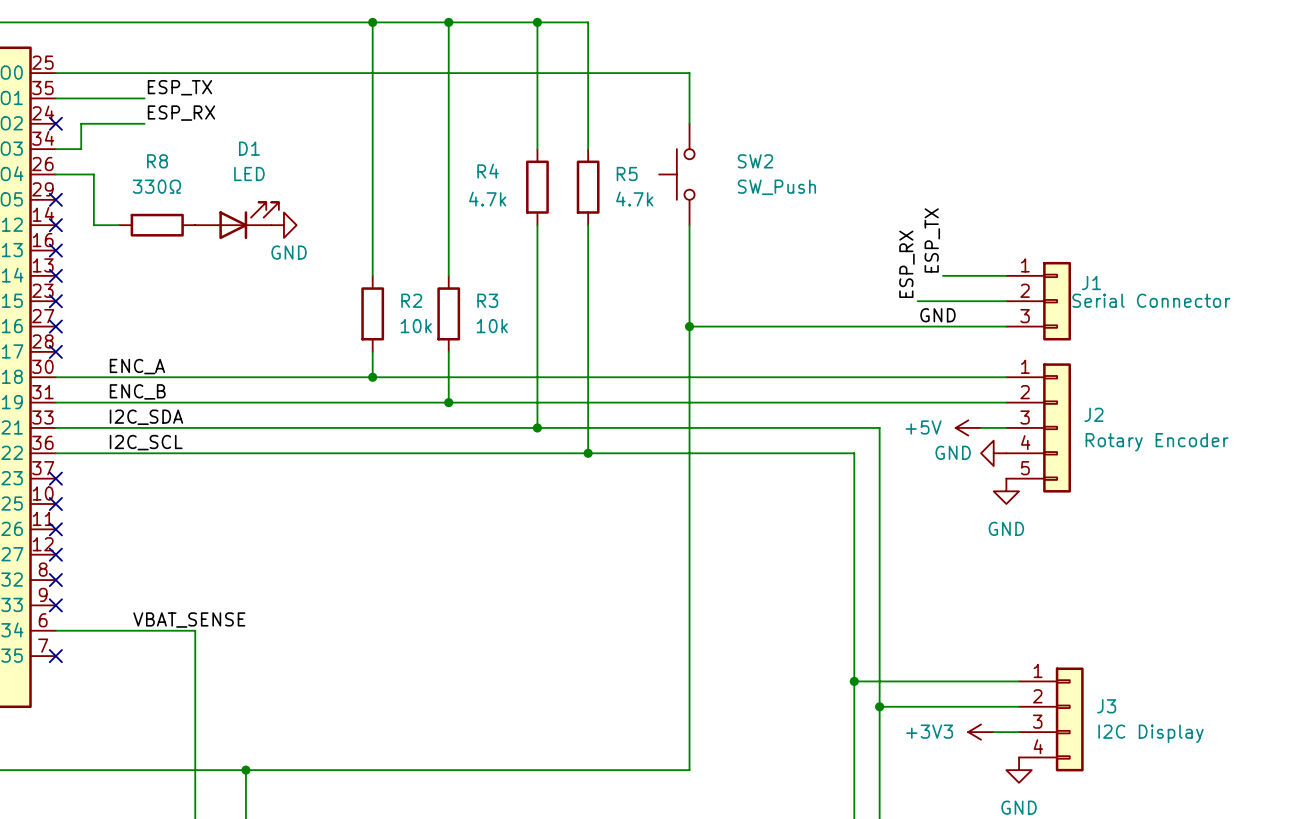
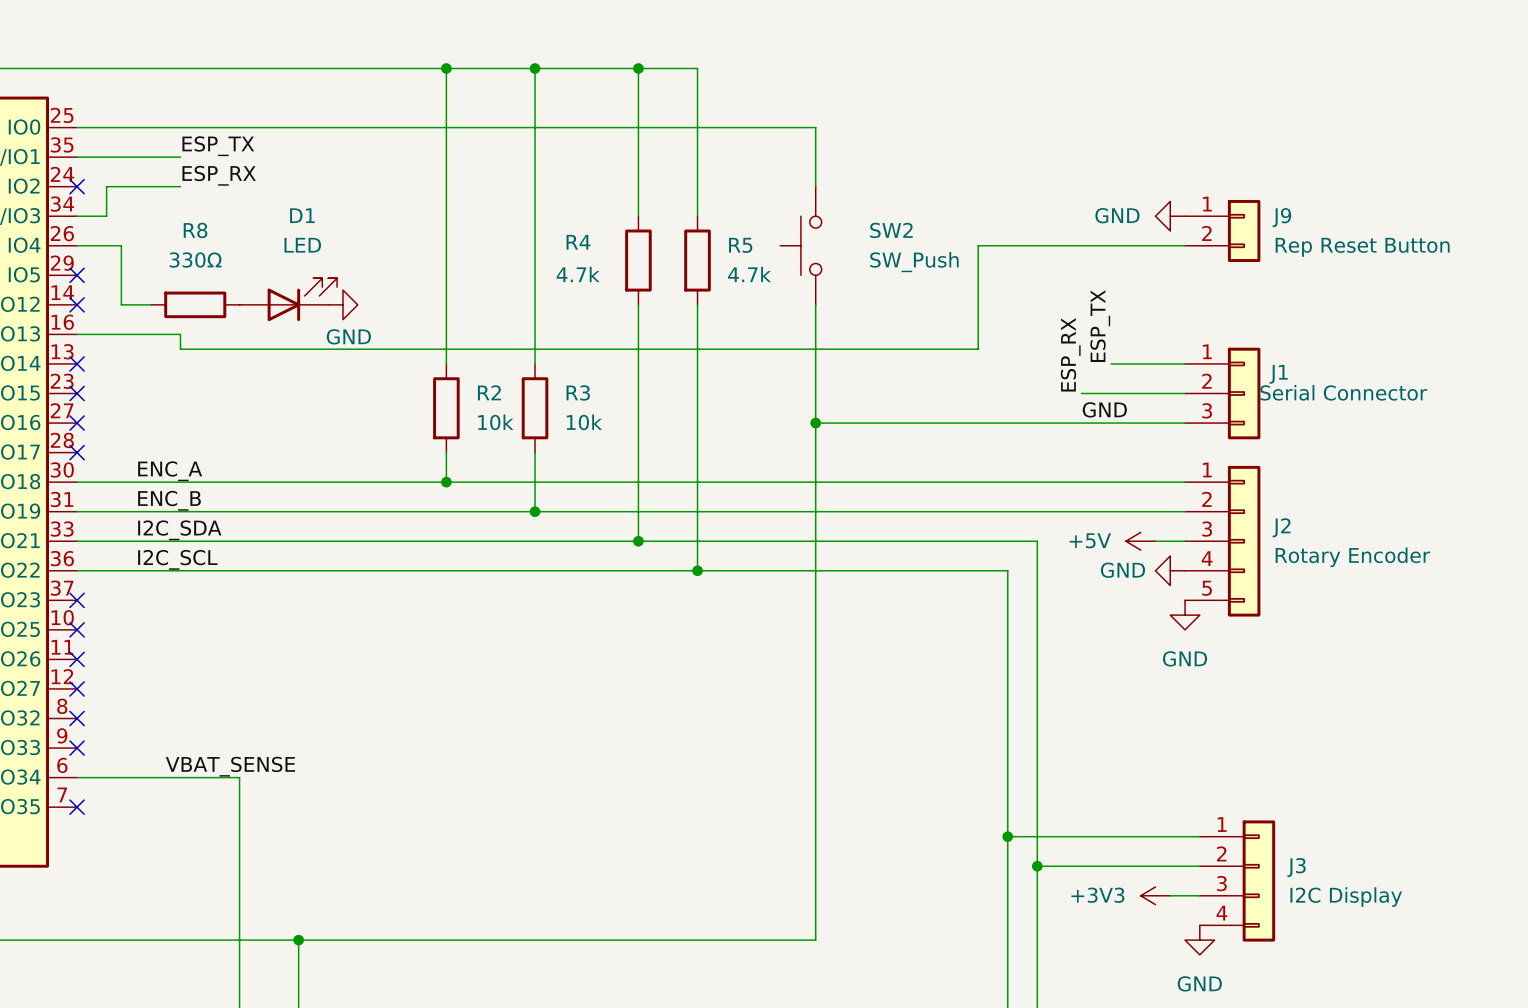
power symbol: none -> GND (1170, 216)
J9: none -> Rep Reset Button (1222, 231)
wire: none -> (1185, 245) (978, 245) (978, 349) (180, 349) (180, 334) (77, 334)
no-connect mark: (55, 250) -> none

